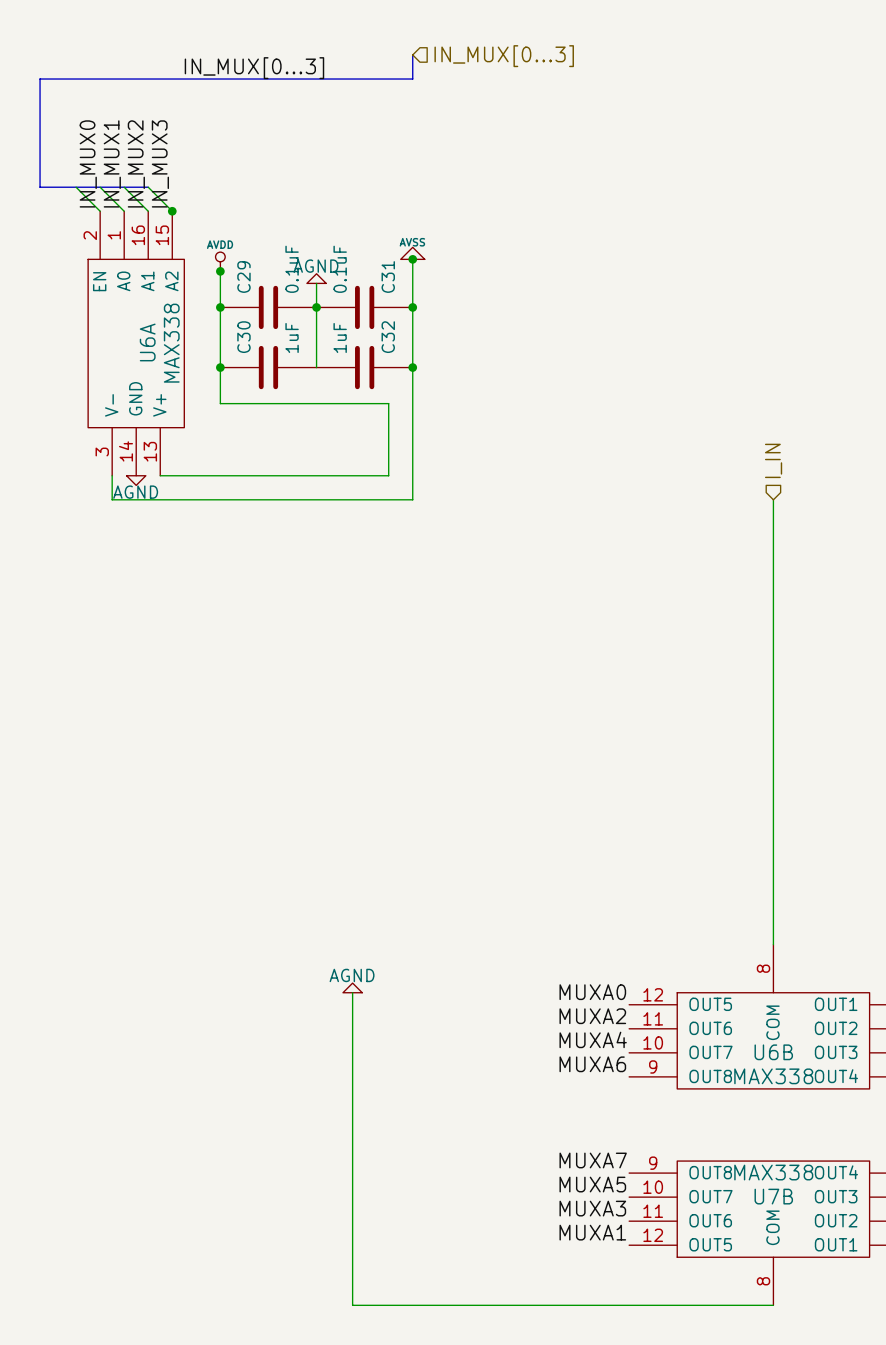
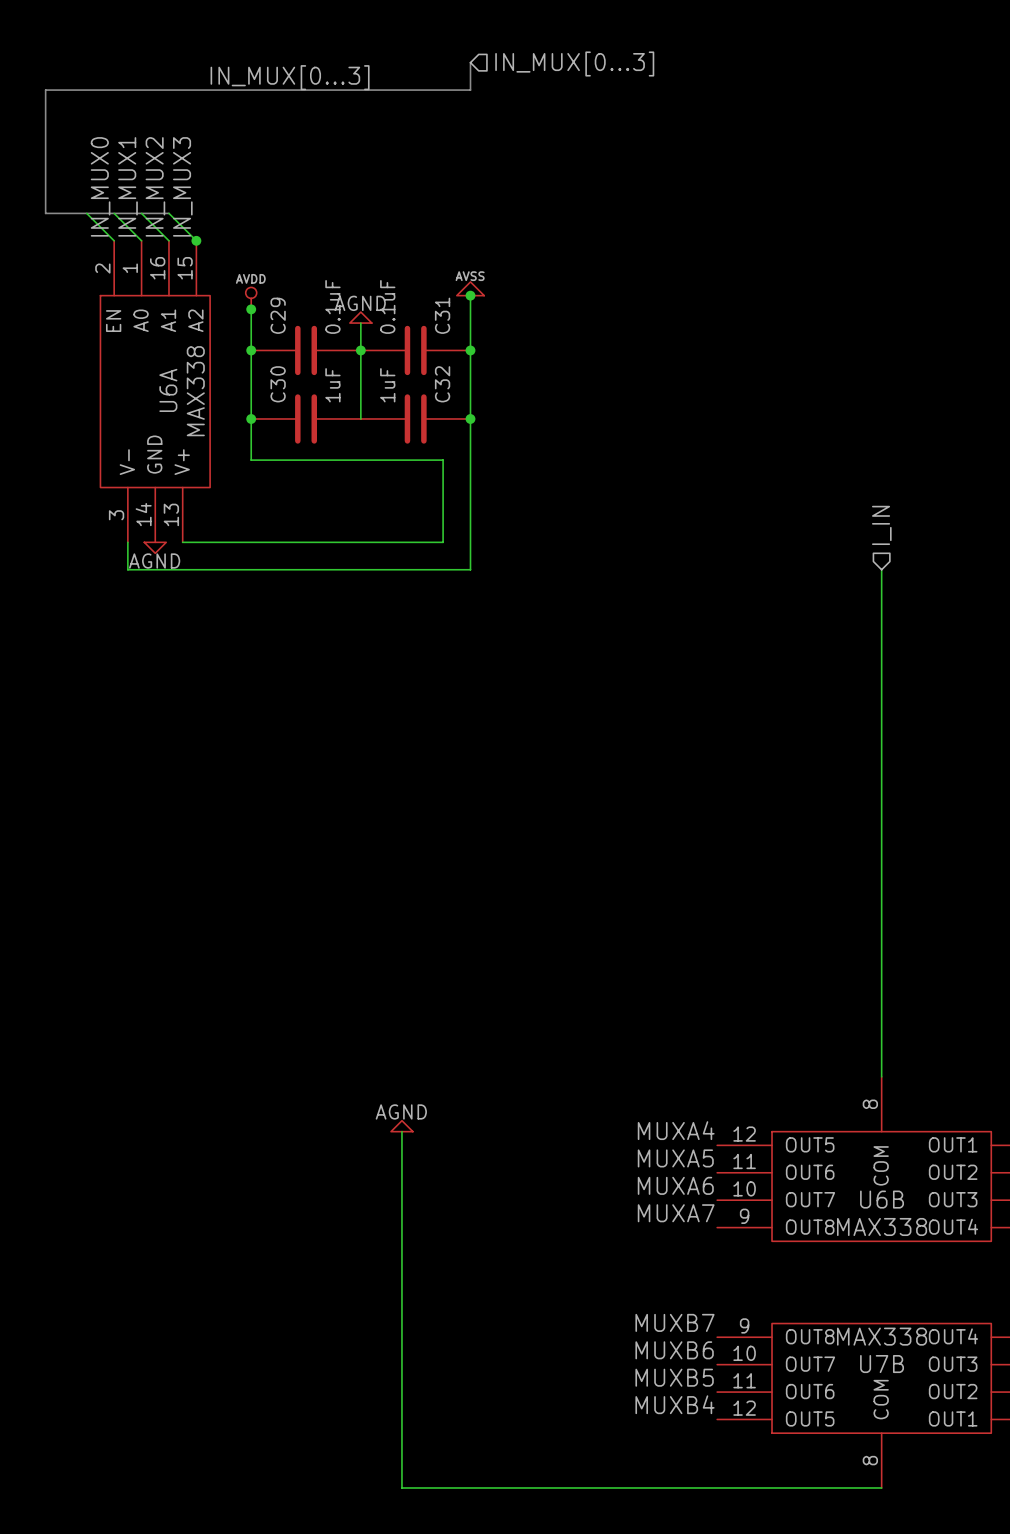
label: MUXA0 (592, 992) -> MUXA4 (676, 1130)
label: MUXA2 (592, 1016) -> MUXA5 (675, 1158)
label: MUXA4 (593, 1039) -> MUXA6 (675, 1185)
label: MUXA6 (592, 1064) -> MUXA7 (676, 1213)
label: MUXA7 (593, 1160) -> MUXB7 (674, 1322)
label: MUXA5 (592, 1184) -> MUXB6 (674, 1350)
label: MUXA3 (592, 1208) -> MUXB5 (674, 1377)
label: MUXA1 (592, 1232) -> MUXB4 (674, 1404)

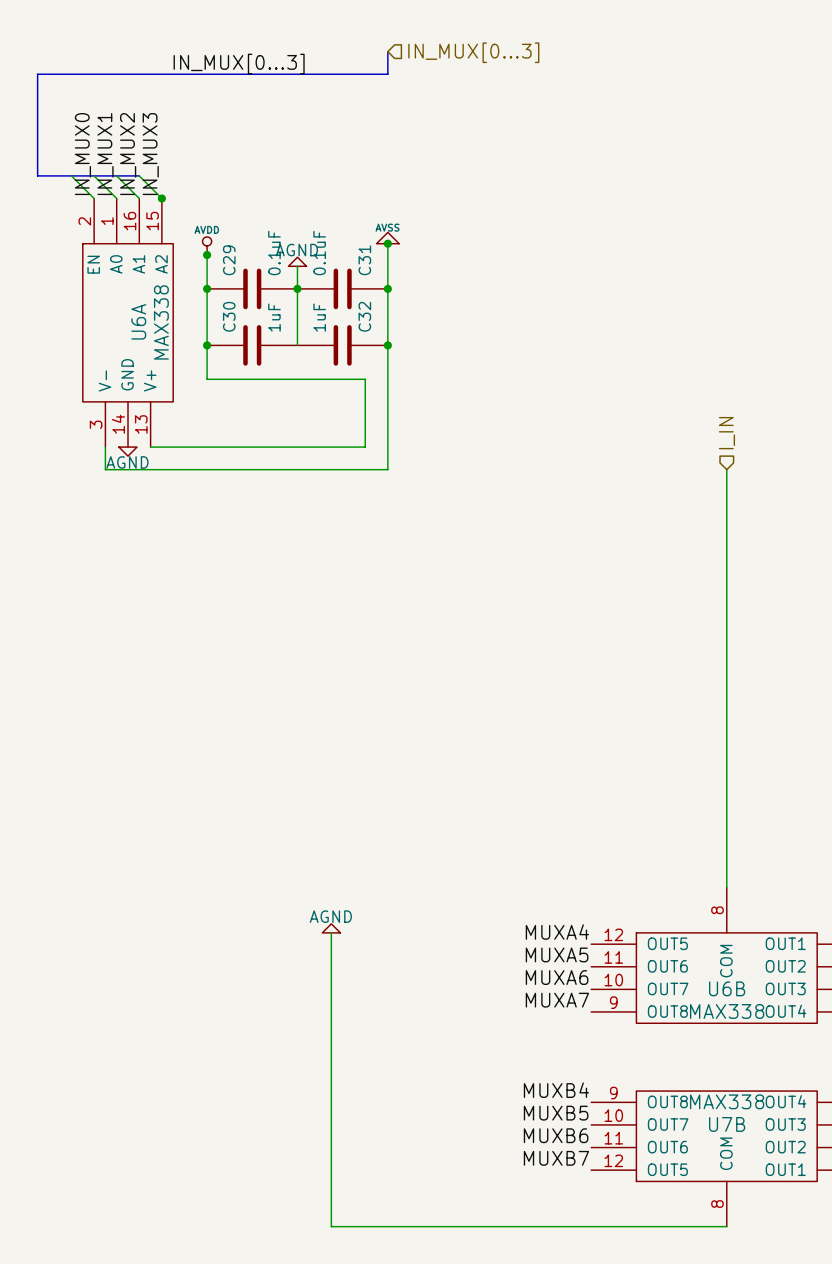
label: MUXB7 (674, 1322) -> MUXB4 (556, 1090)
label: MUXB6 (674, 1350) -> MUXB5 (556, 1113)
label: MUXB5 (674, 1377) -> MUXB6 (556, 1135)
label: MUXB4 (674, 1404) -> MUXB7 (556, 1158)

